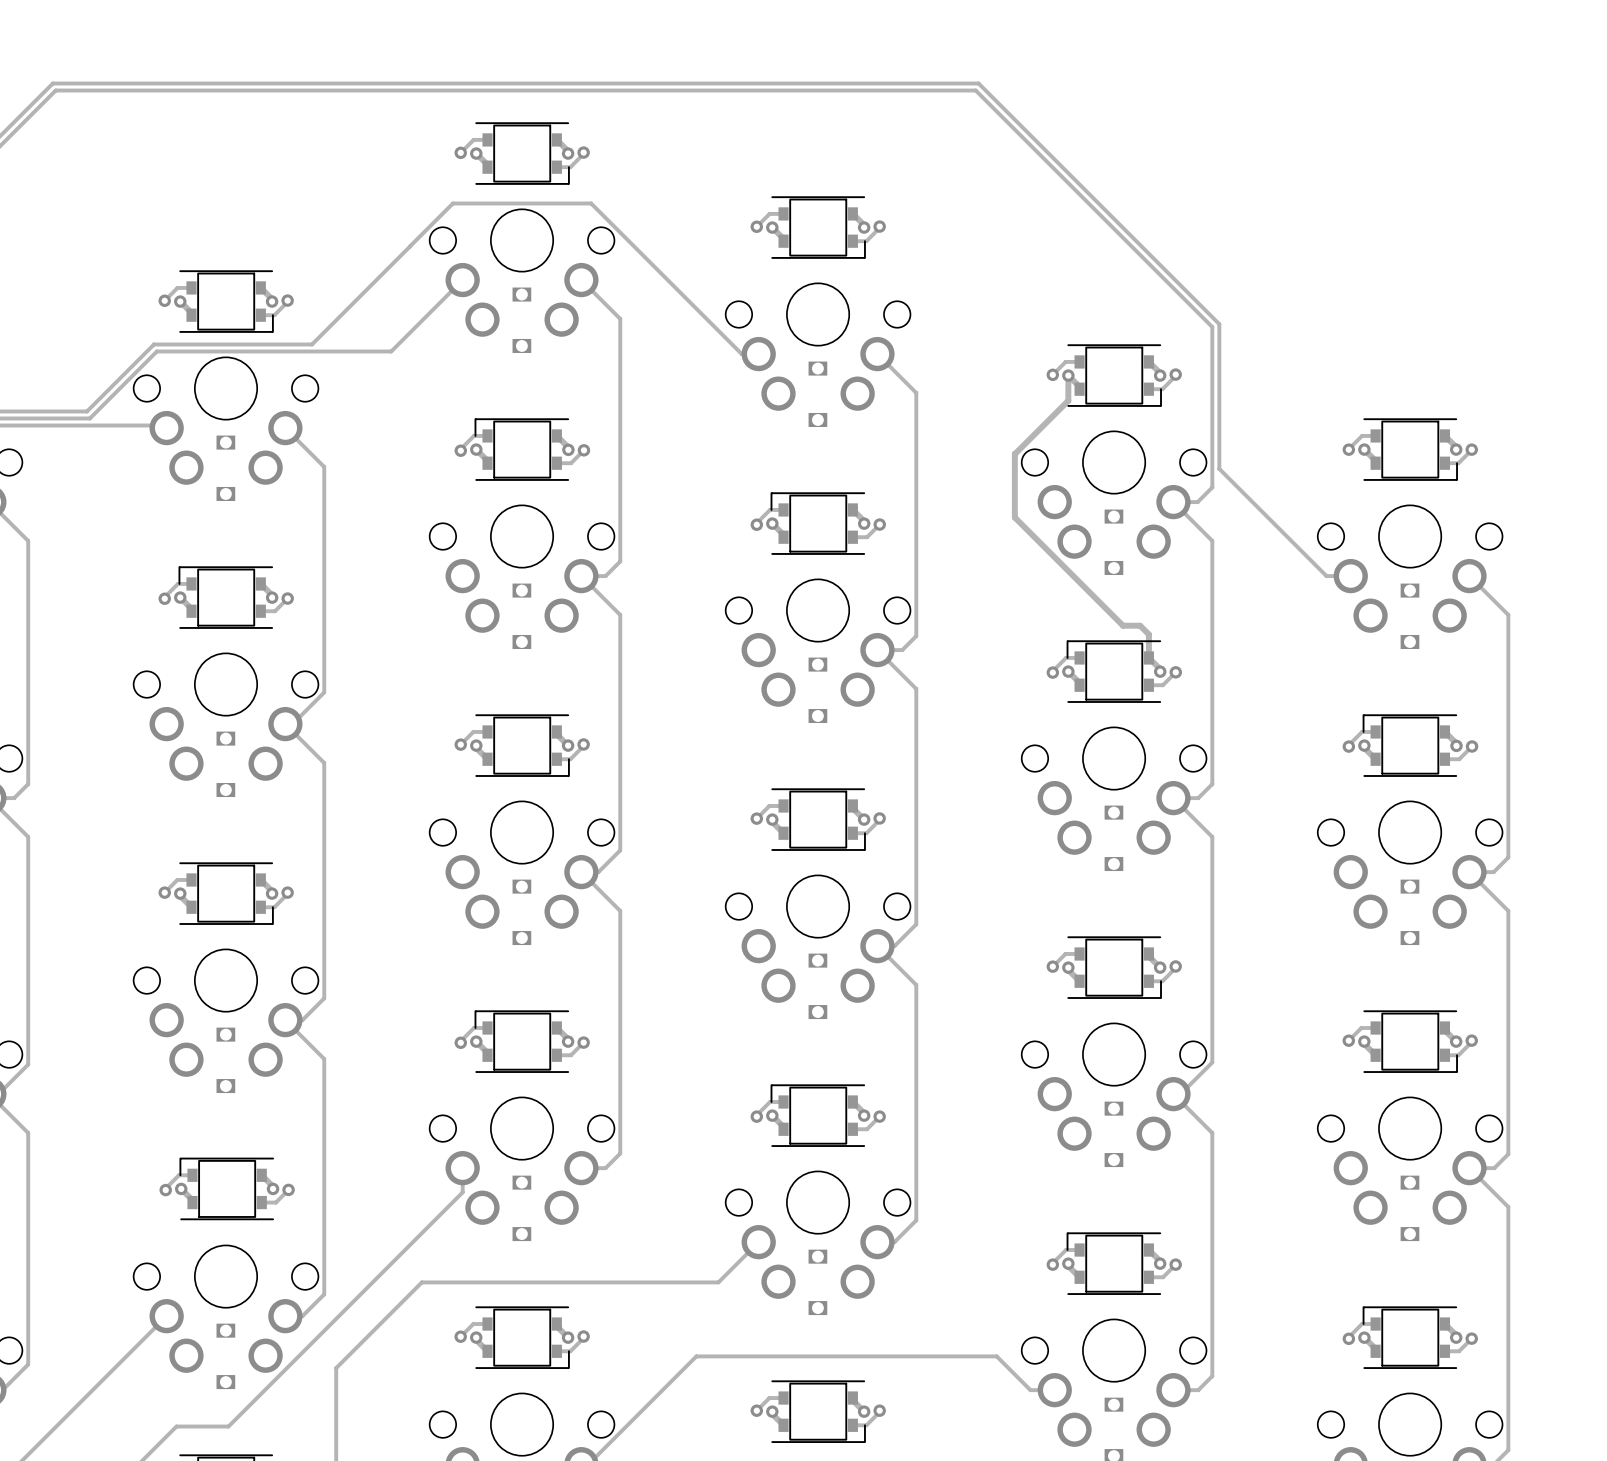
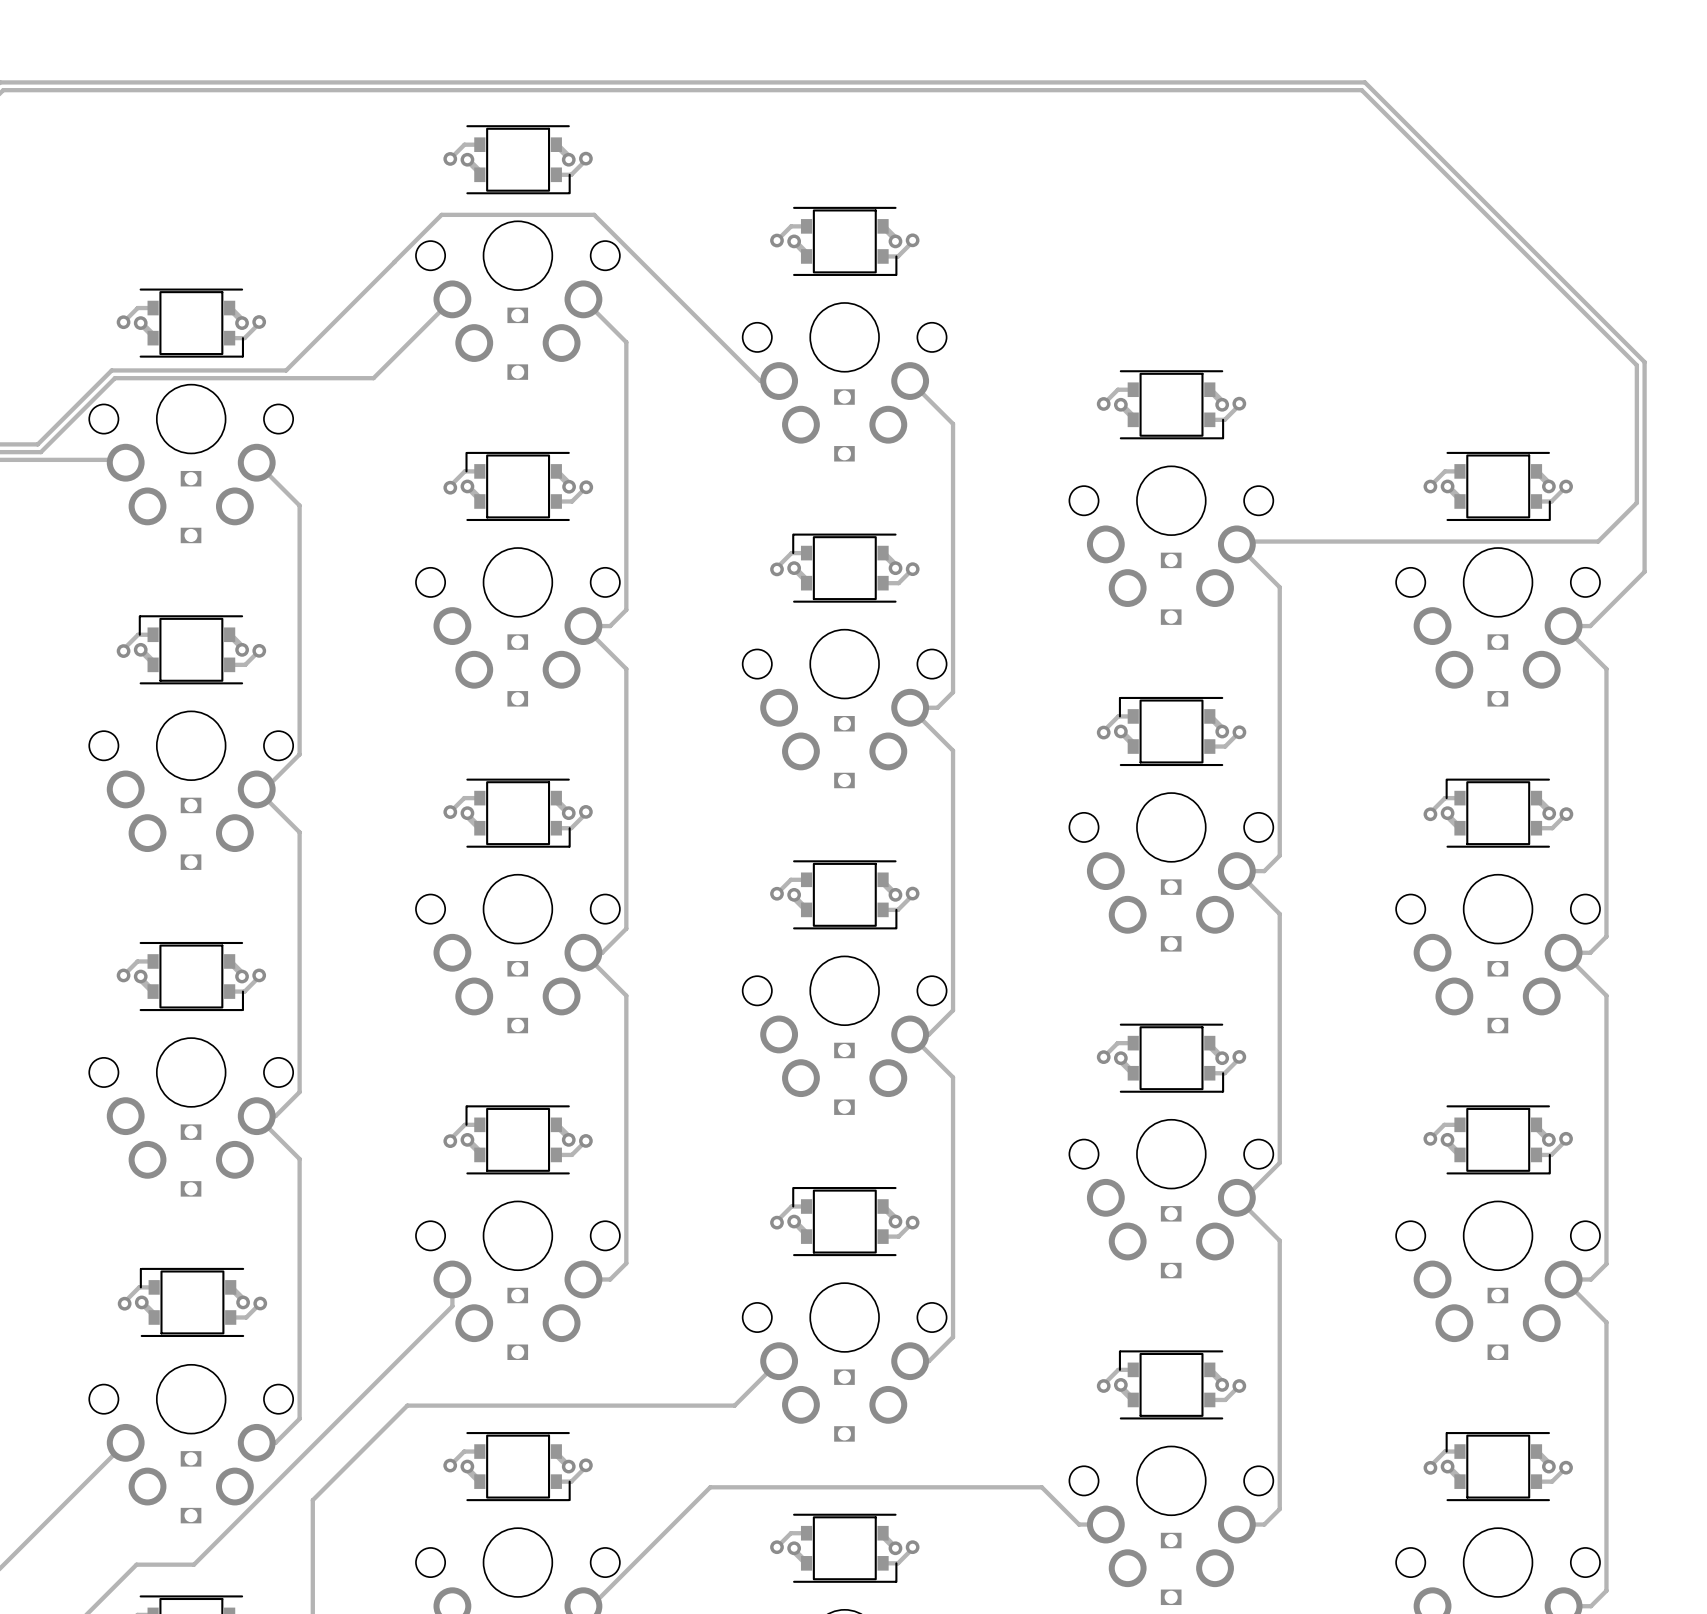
track: (978, 83) (1219, 324) (1219, 468) (1326, 576) (1350, 576) -> (1021, 82) (1364, 82) (1644, 362) (1644, 571) (1590, 626) (1563, 626)
track: (975, 90) (1212, 327) (1212, 487) (1197, 502) (1173, 502) -> (1018, 90) (1361, 90) (1636, 365) (1636, 502) (1598, 541) (1239, 541)
track: (1068, 375) (1068, 400) (1014, 454) (1014, 517) (1123, 625) (1140, 625) (1148, 634) (1148, 657) -> none

